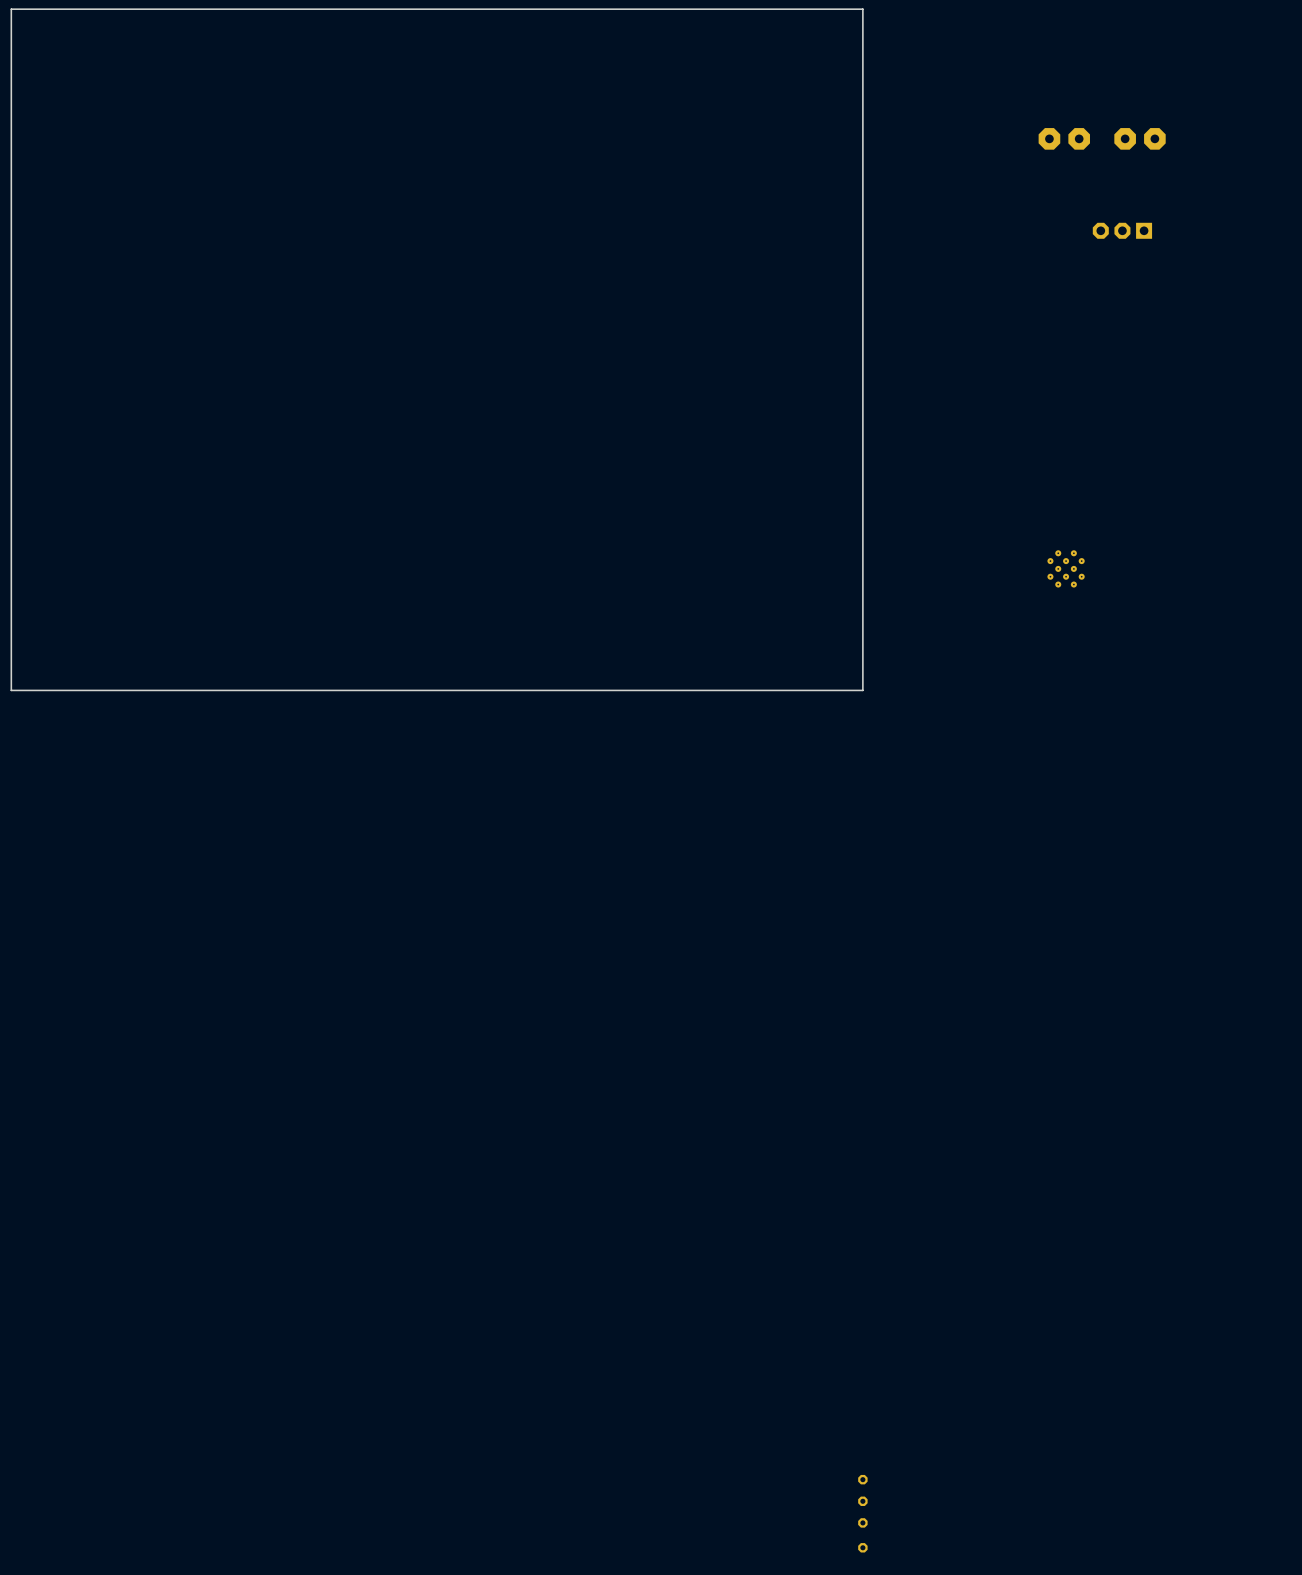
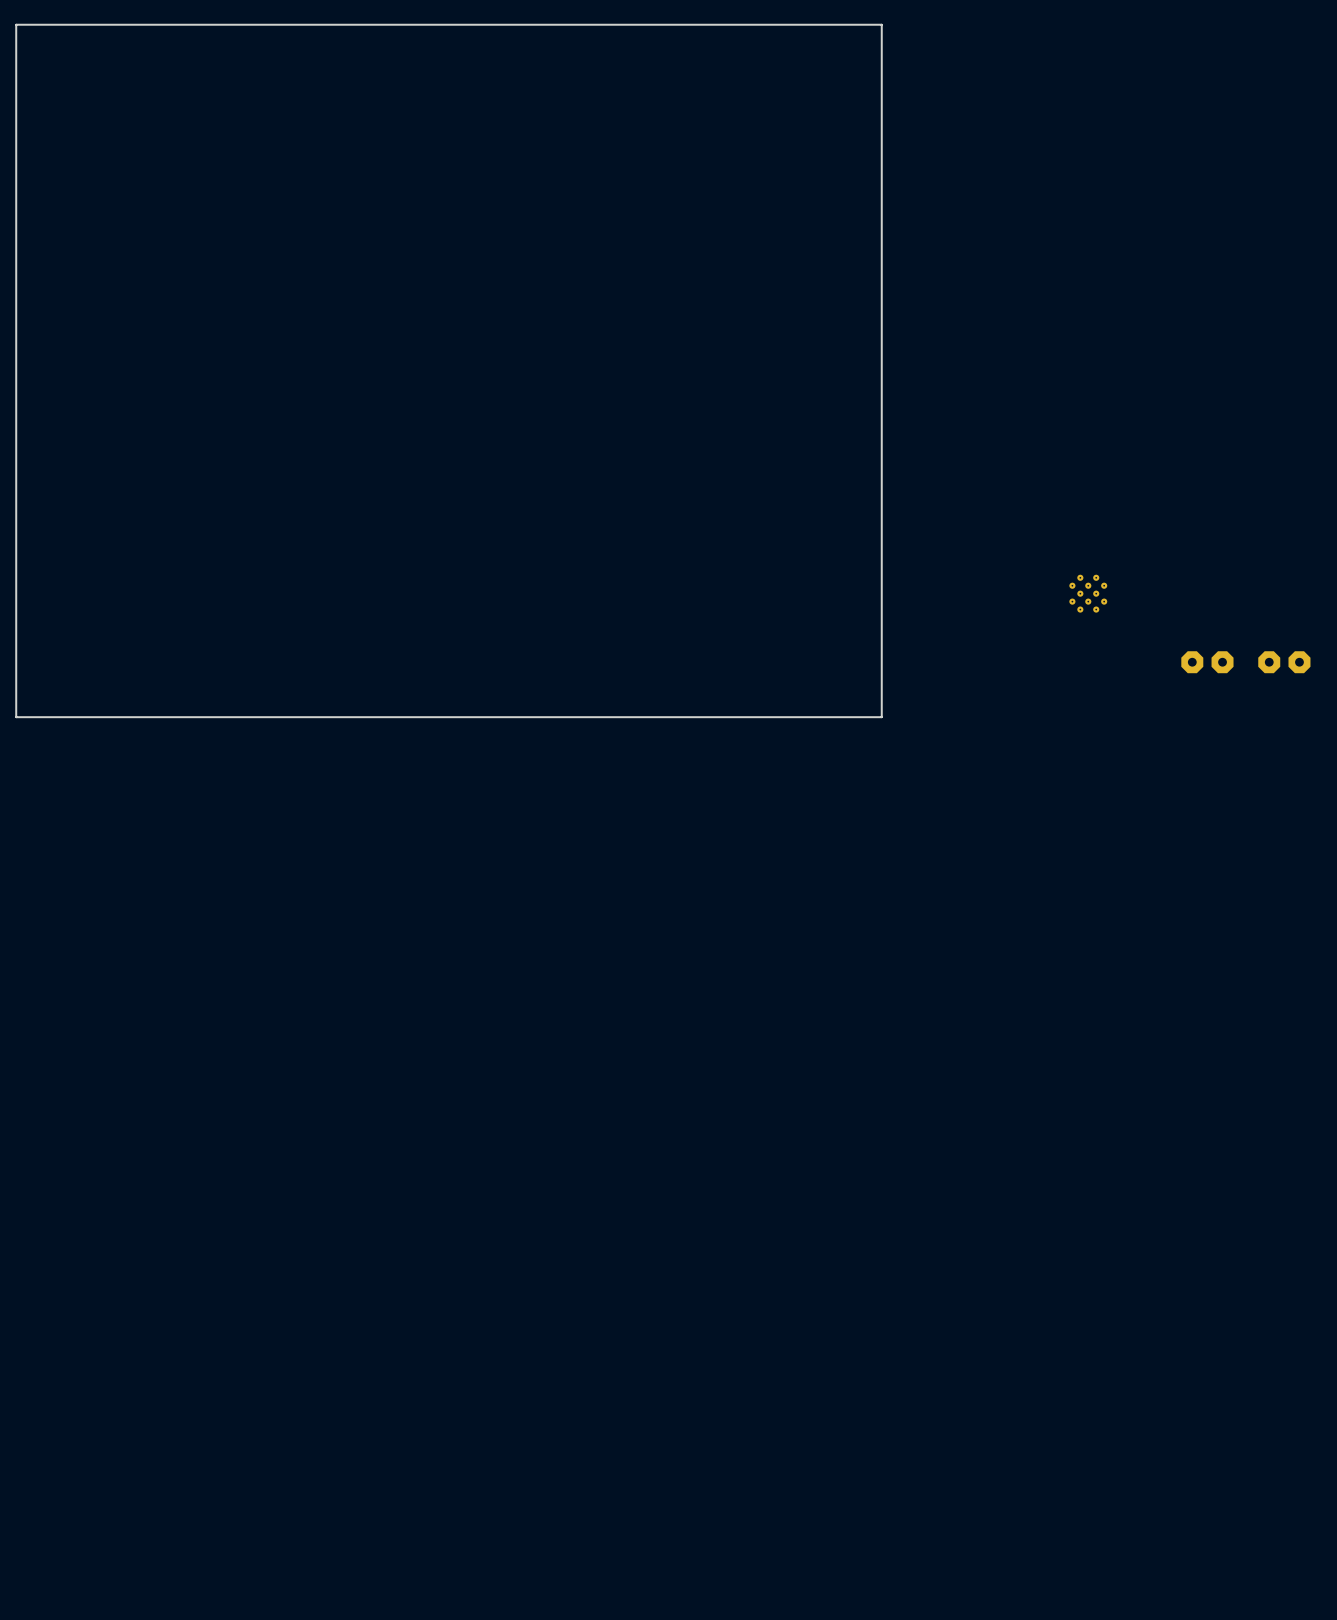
part: (1064, 138) -> none
part: (1140, 138) -> none
part: (1122, 230) -> none
part: none -> (1207, 662)
part: none -> (1284, 662)
part: (862, 1513) -> none

